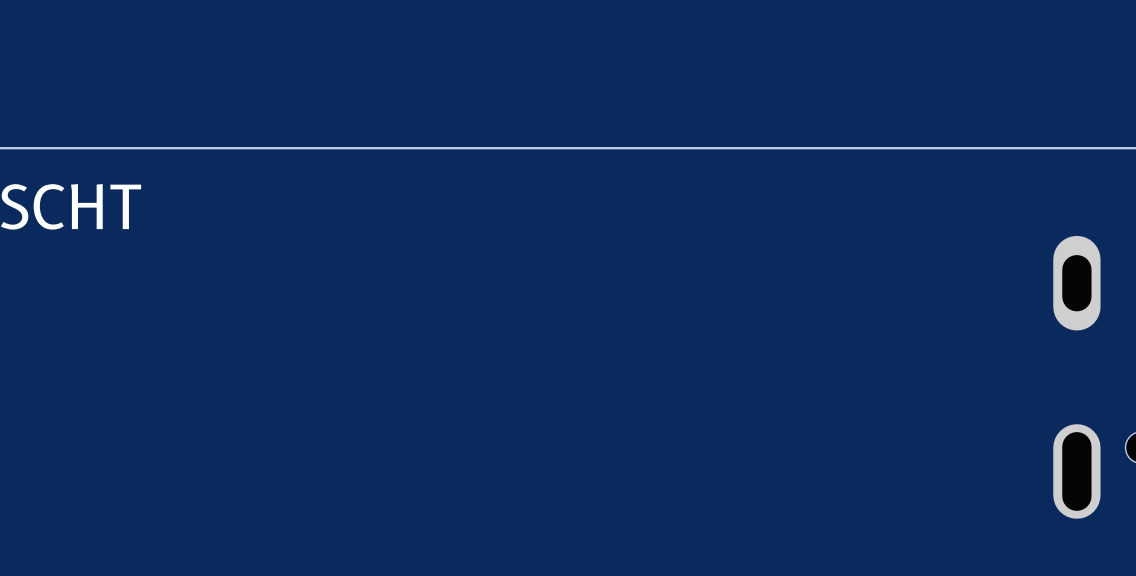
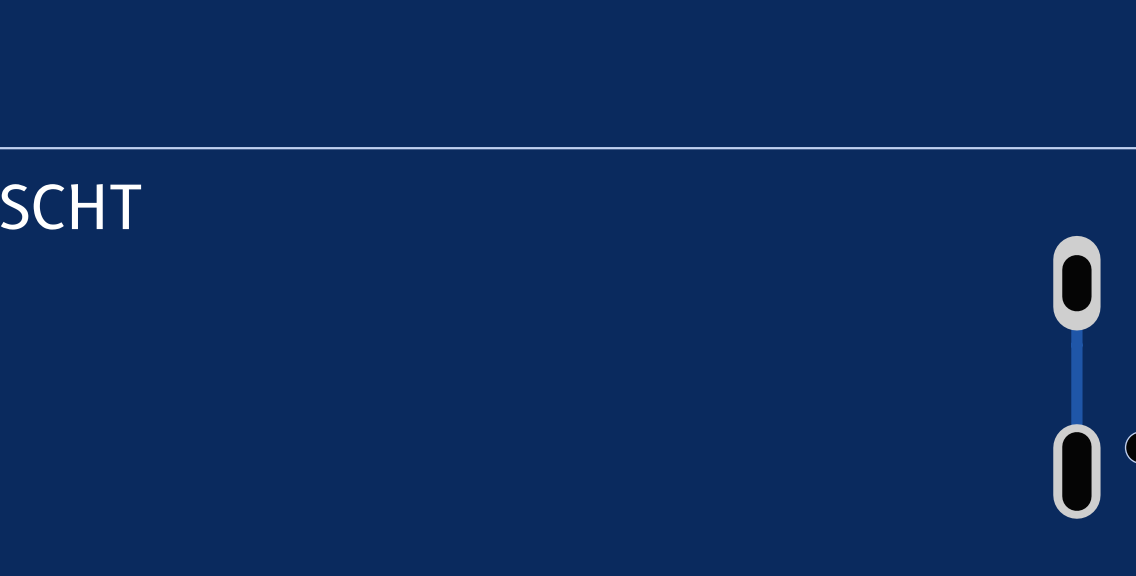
track: none -> (1076, 283) (1076, 471)

